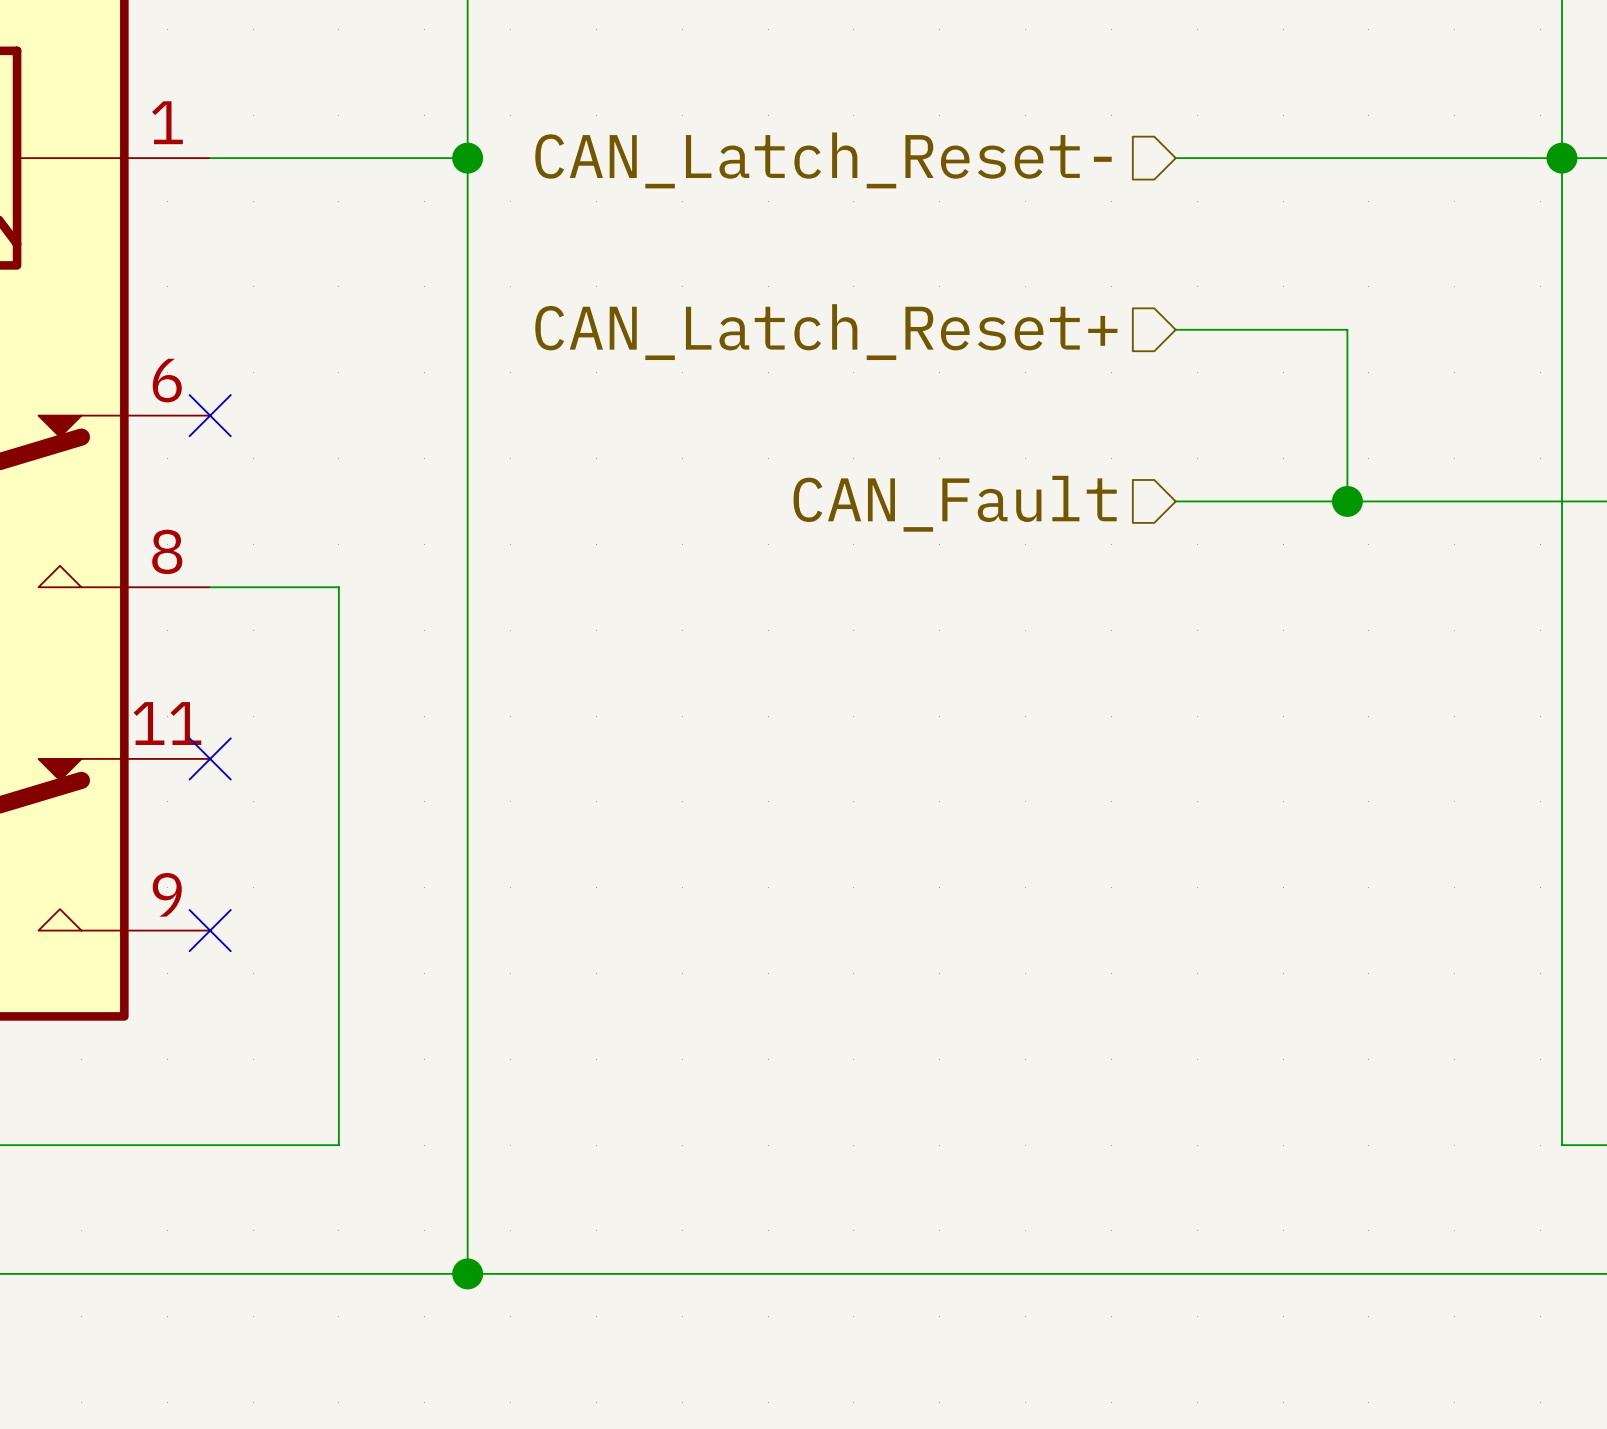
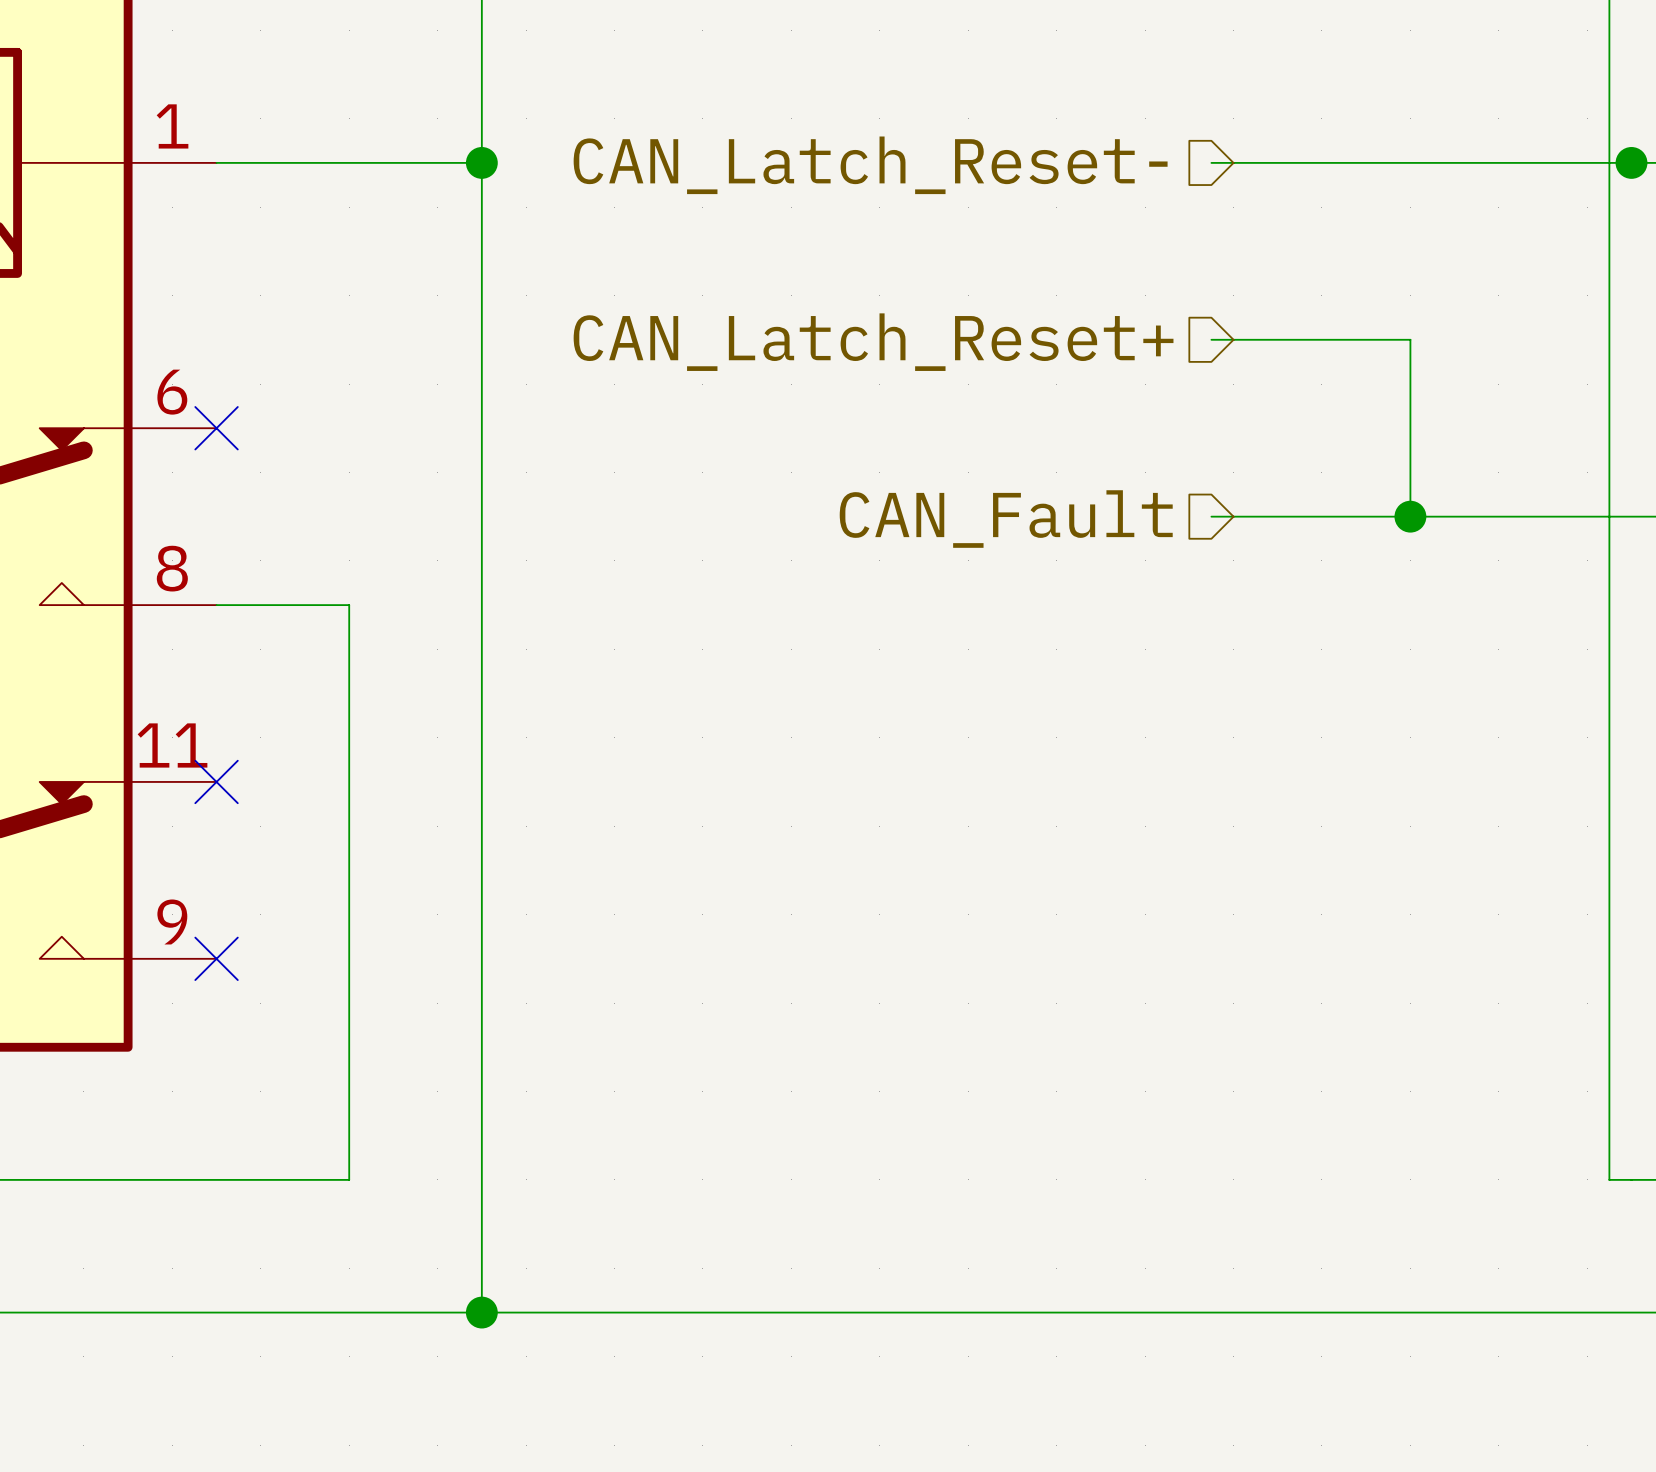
junction position: (1561, 158) -> (1631, 162)
hierarchical label position: CAN_Latch_Reset- (823, 160) -> CAN_Latch_Reset- (870, 165)
wire: (1347, 329) (1347, 501) -> (1388, 339) (1410, 339) (1410, 516)
hierarchical label position: CAN_Latch_Reset+ (826, 332) -> CAN_Latch_Reset+ (873, 342)
junction position: (1347, 501) -> (1410, 516)
hierarchical label position: CAN_Fault (955, 503) -> CAN_Fault (1006, 519)

